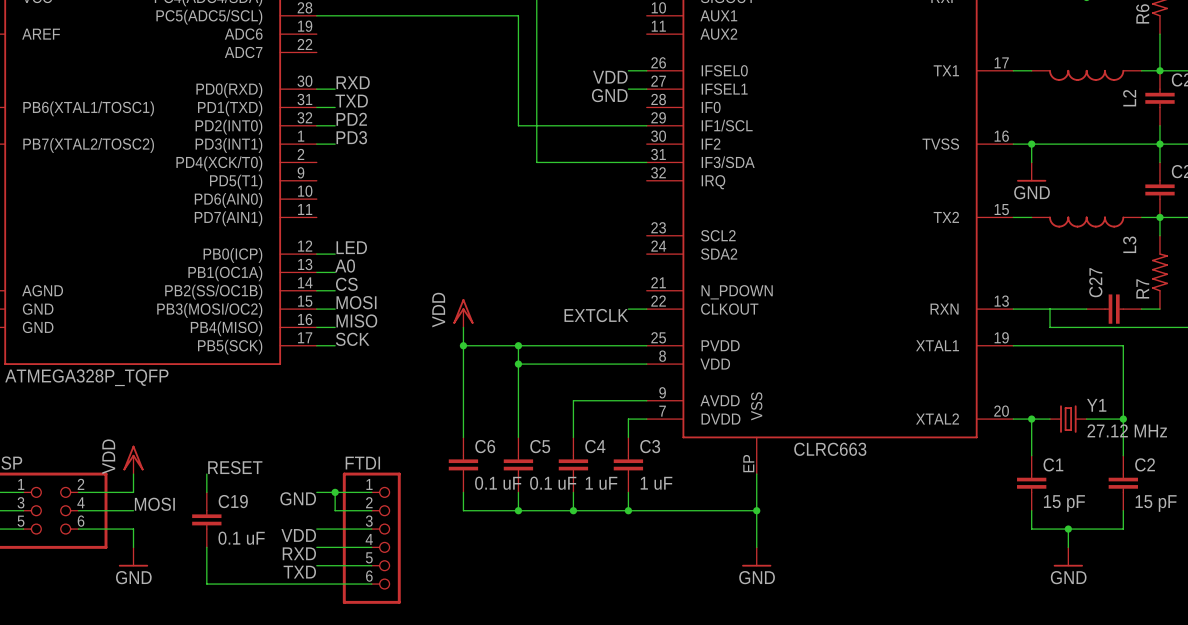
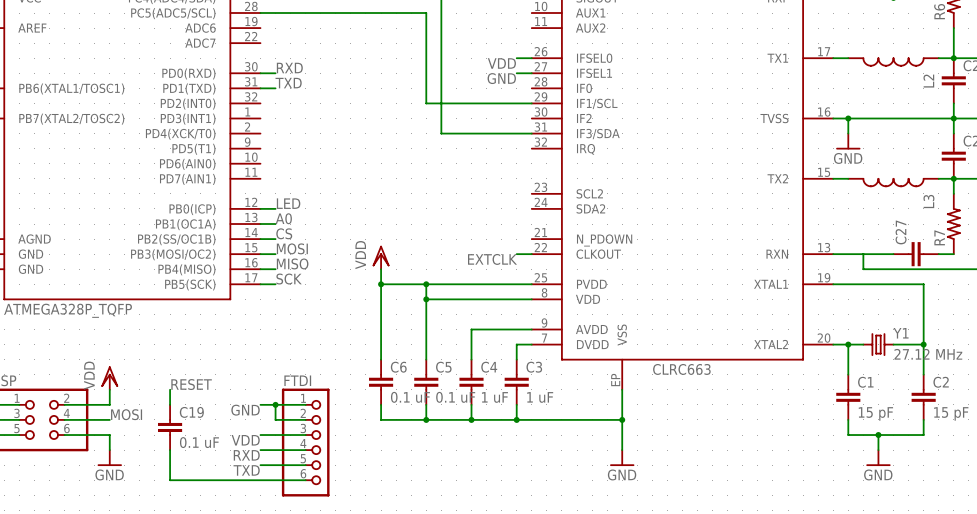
label: PD2 (351, 119) -> none
wire: (316, 125) (335, 125) -> none
label: PD3 (351, 137) -> none
wire: (316, 144) (335, 144) -> none

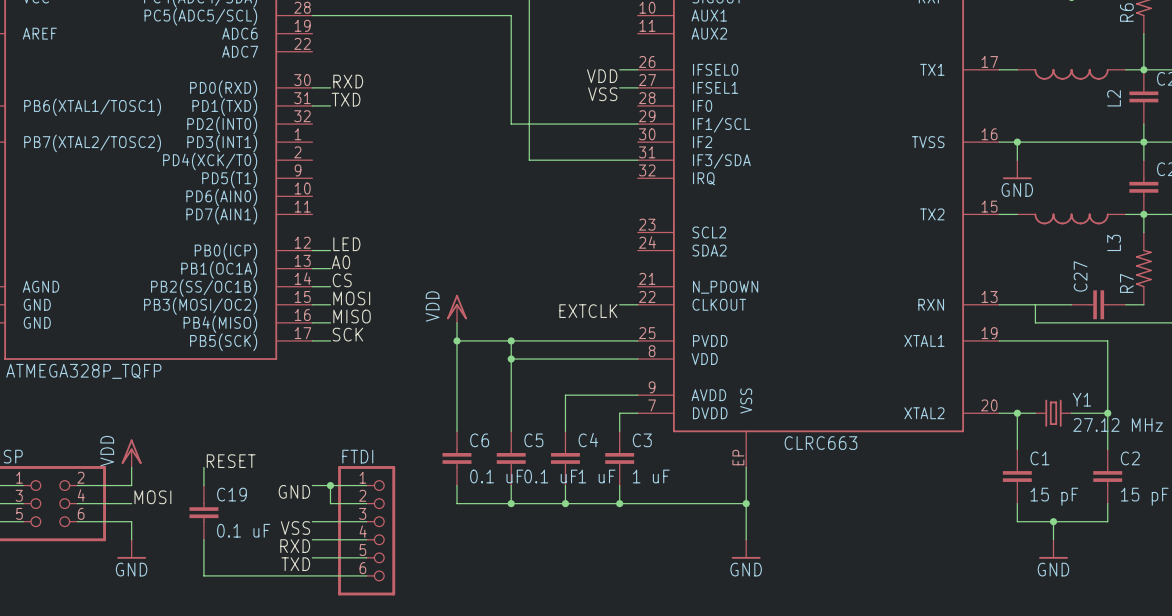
label: GND (501, 78) -> VSS (602, 94)
label: VDD (245, 440) -> VSS (295, 528)

